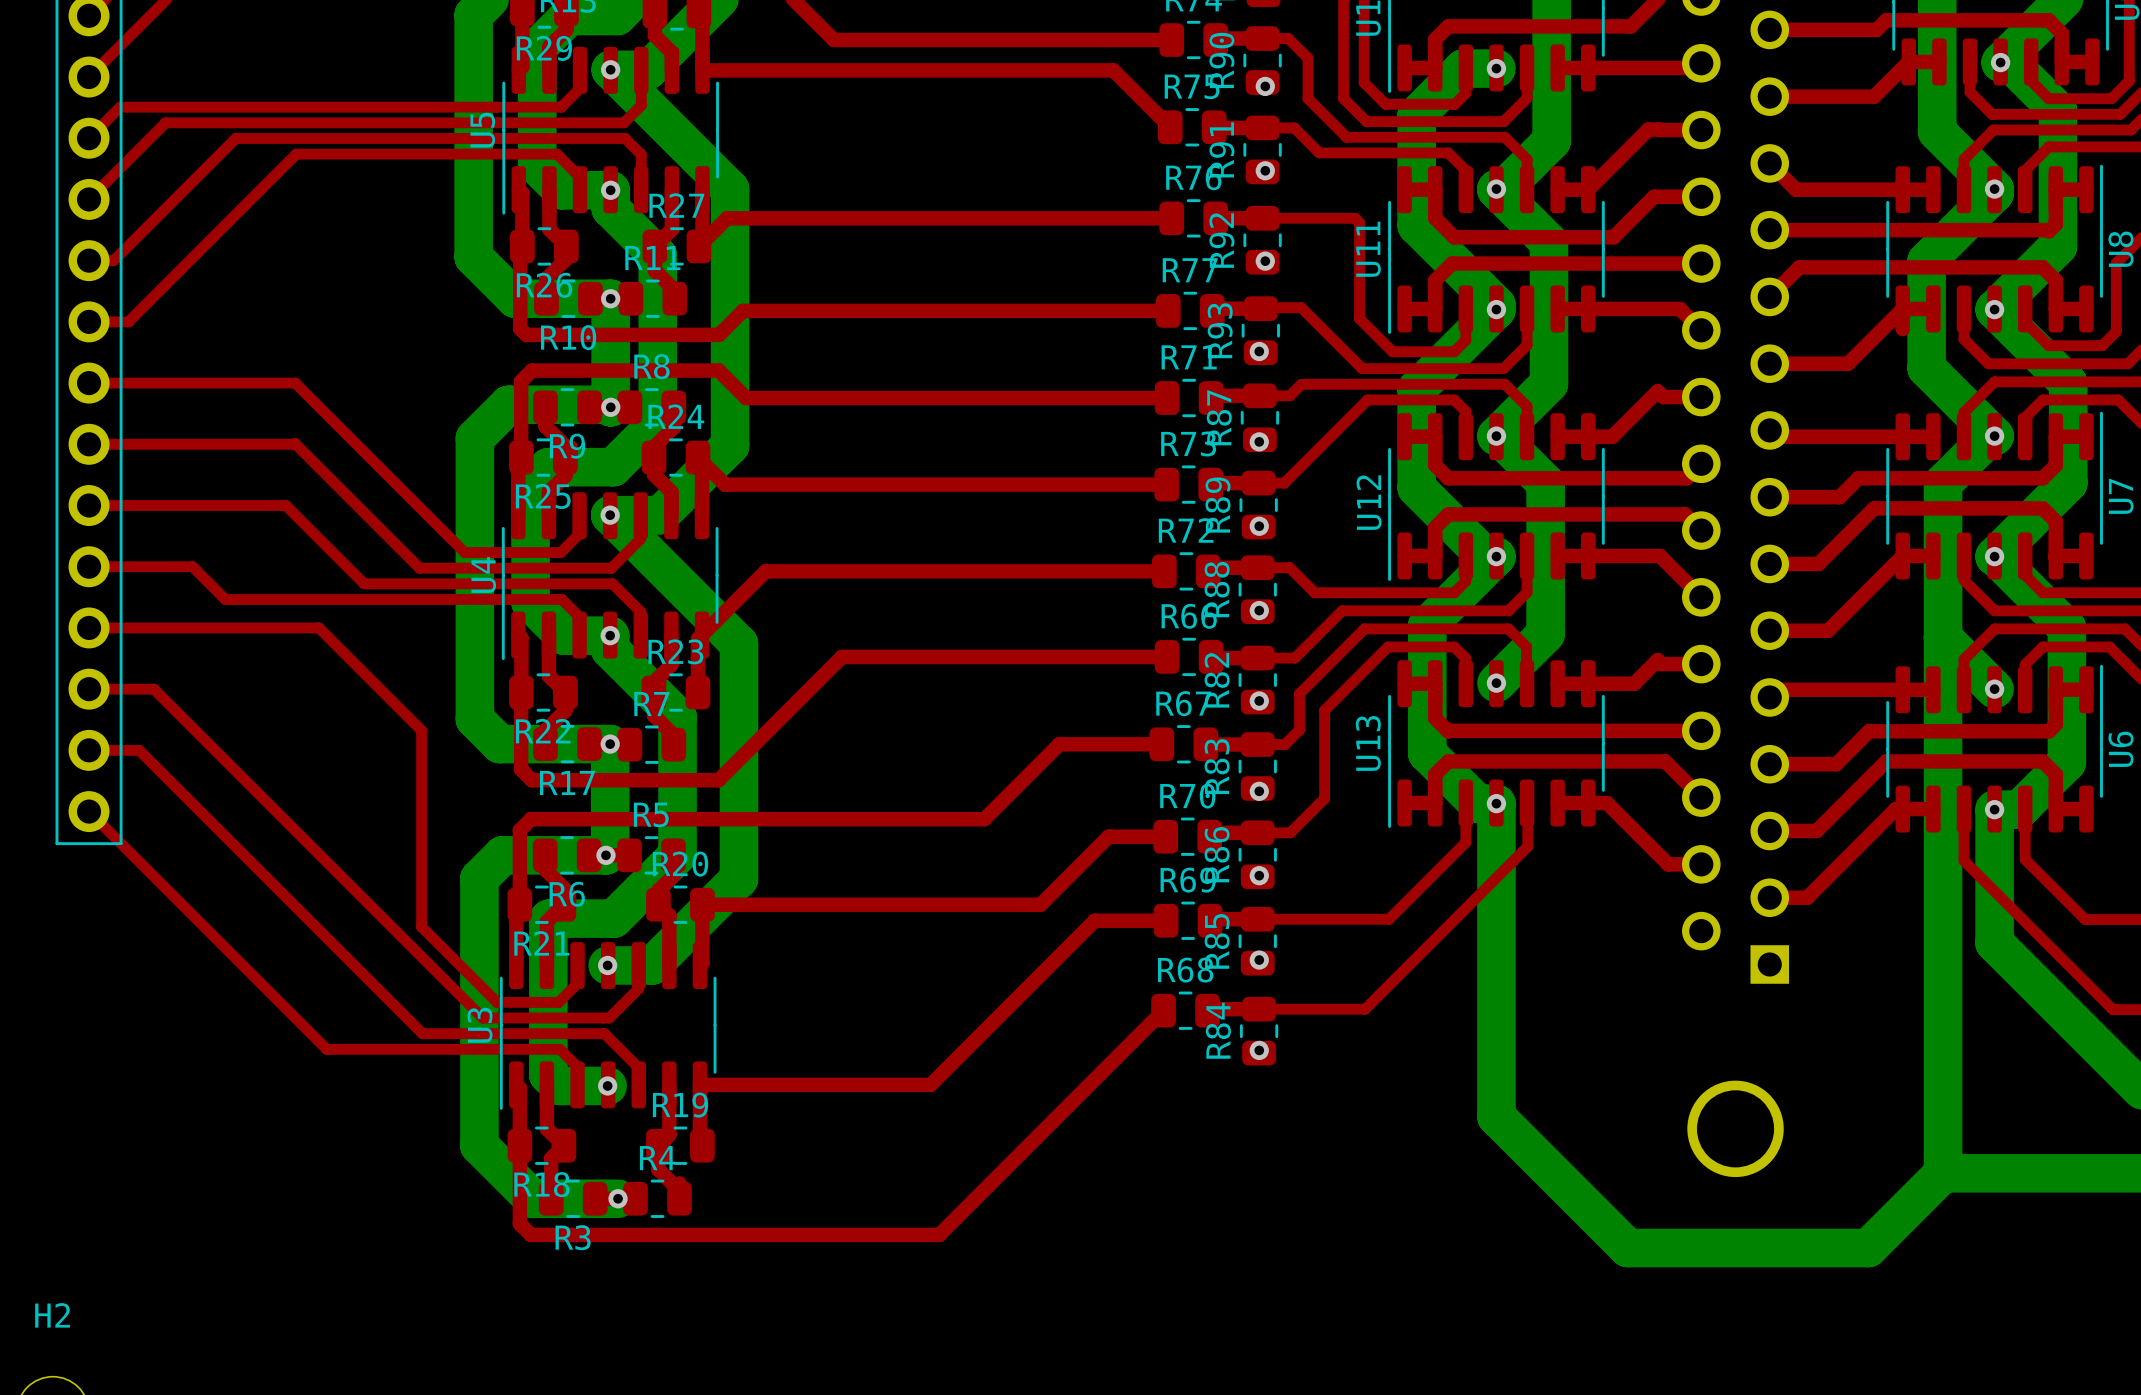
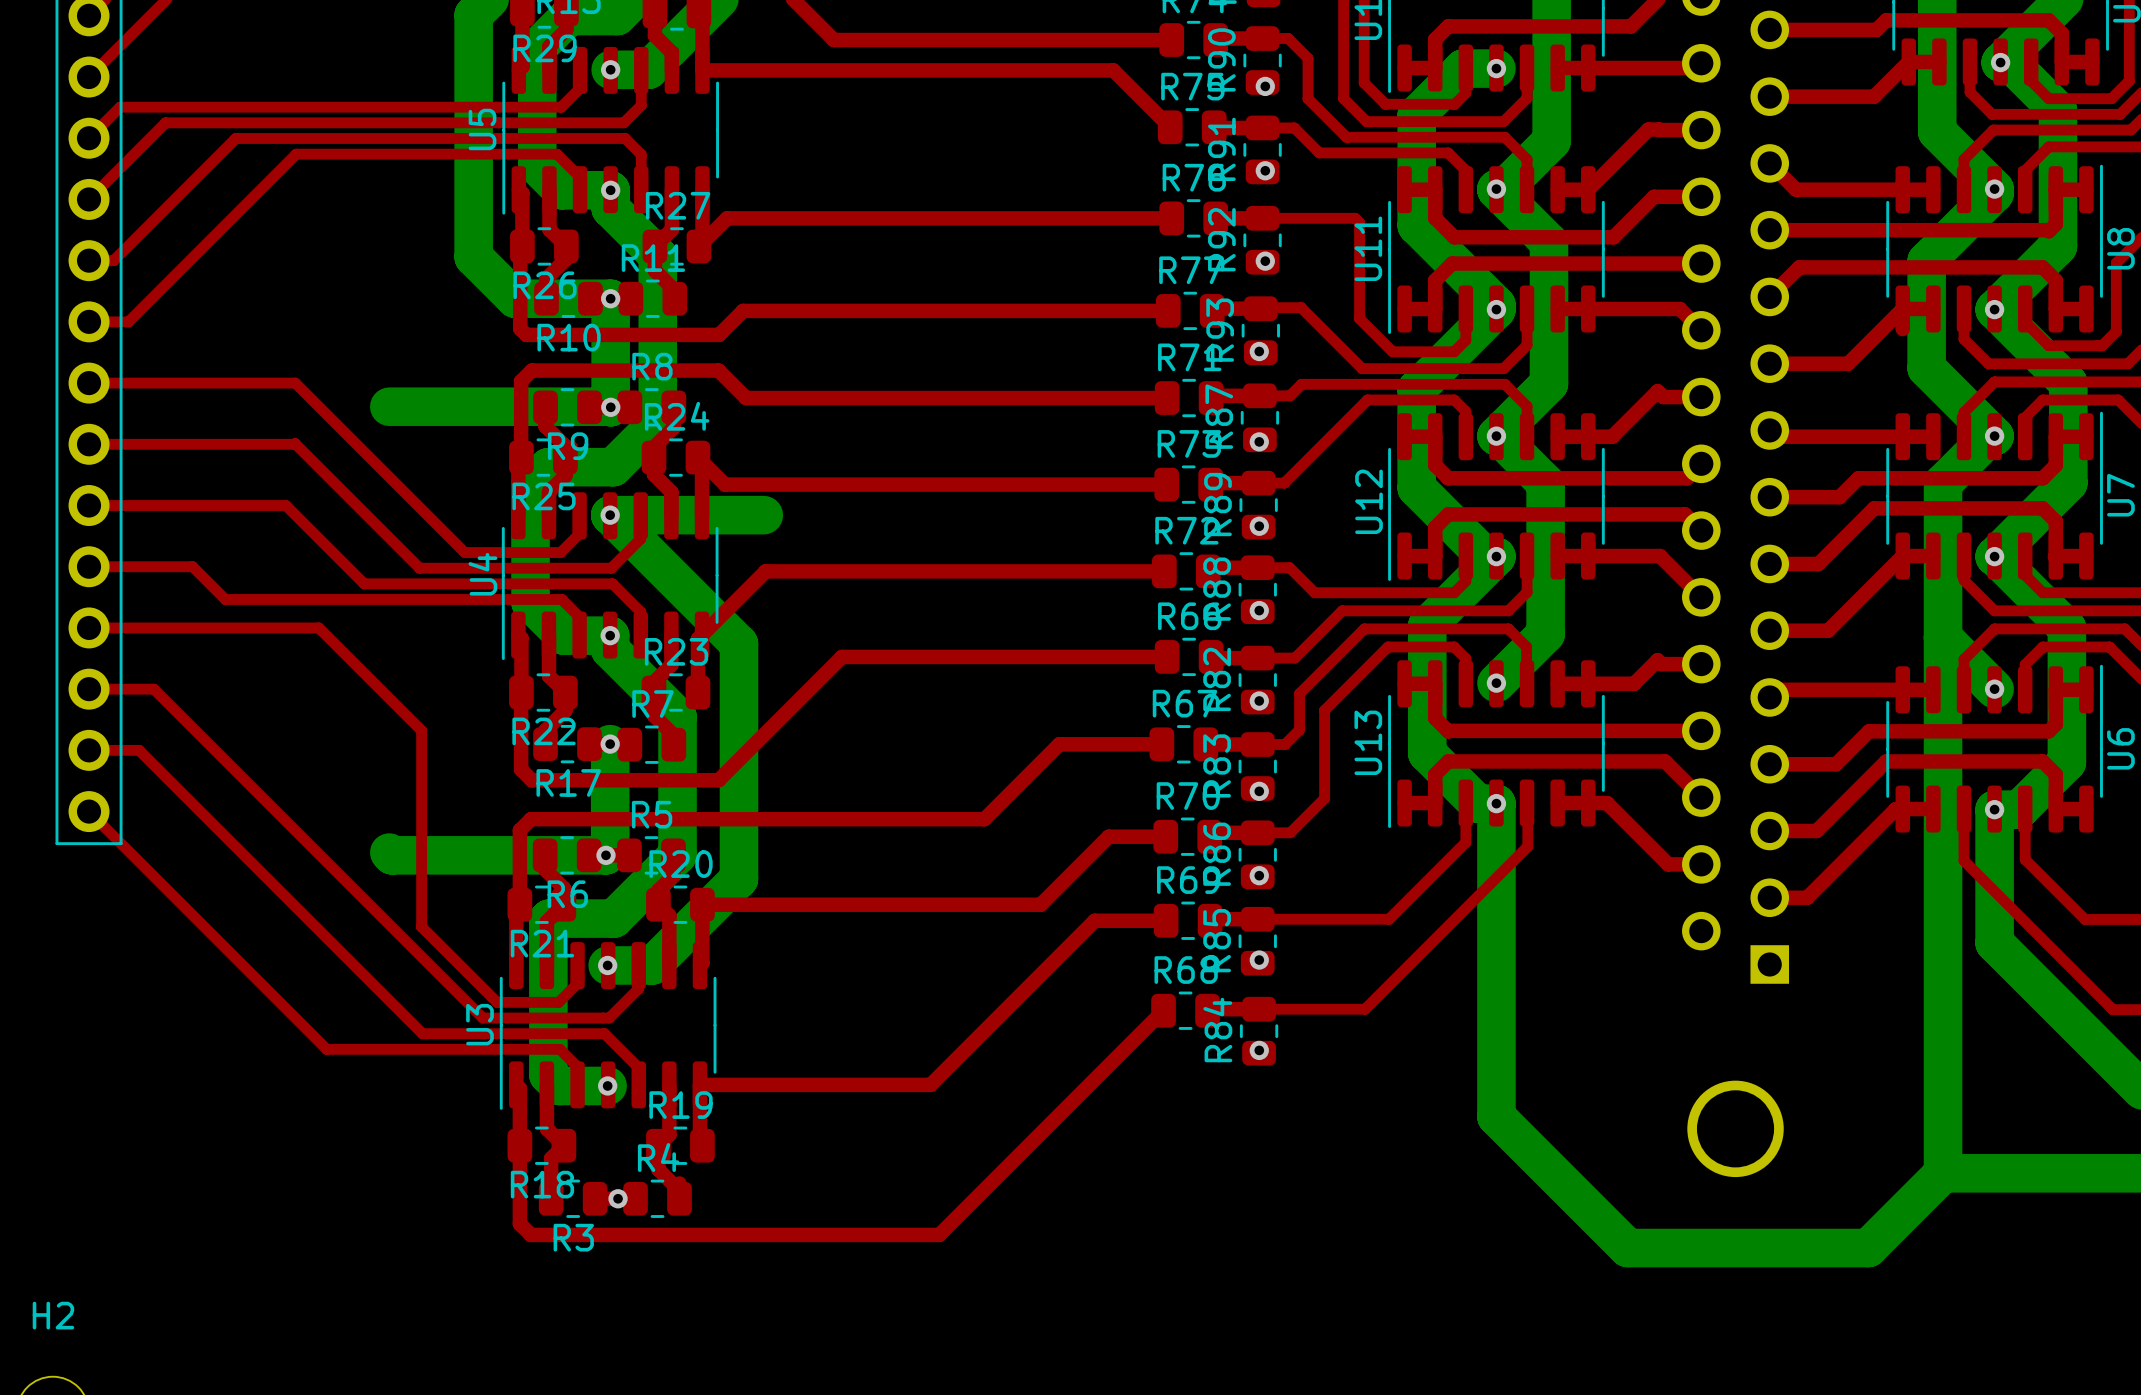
bottom track: (610, 69) (730, 189) (730, 445) (660, 515) -> (763, 515) (660, 515)
bottom track: (608, 404) (508, 404) (474, 438) (474, 719) (499, 744) (610, 744) -> none
bottom track: none -> (389, 406) (610, 406)
bottom track: (502, 855) (479, 878) (479, 1145) (532, 1198) (618, 1198) -> (502, 855) (392, 855) (389, 852)

